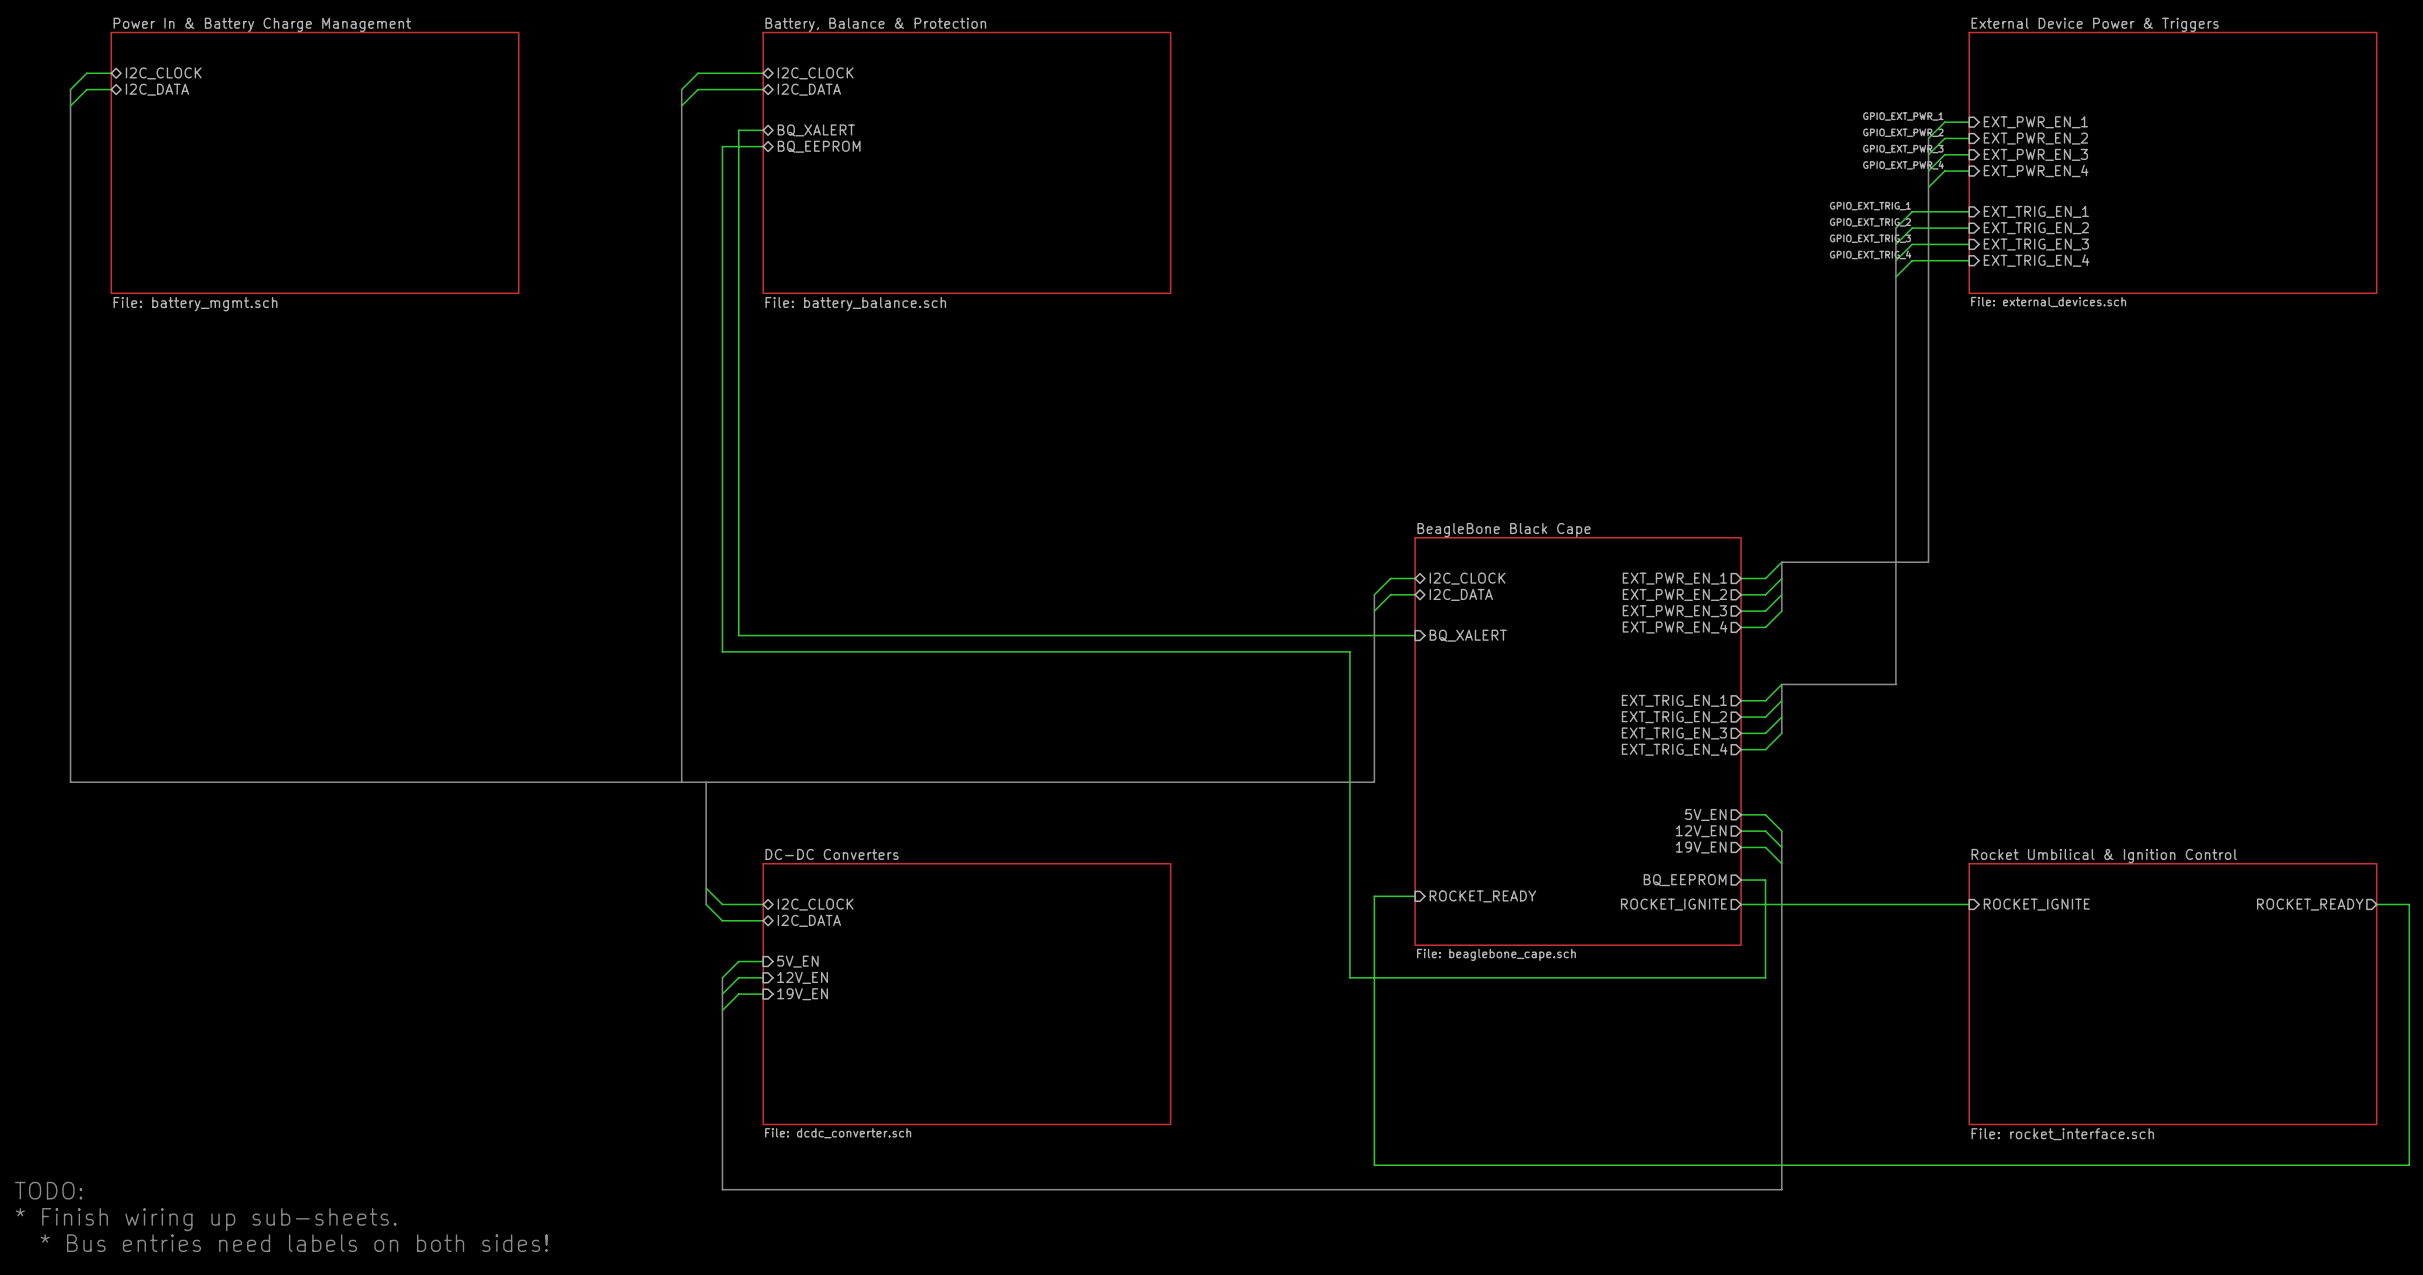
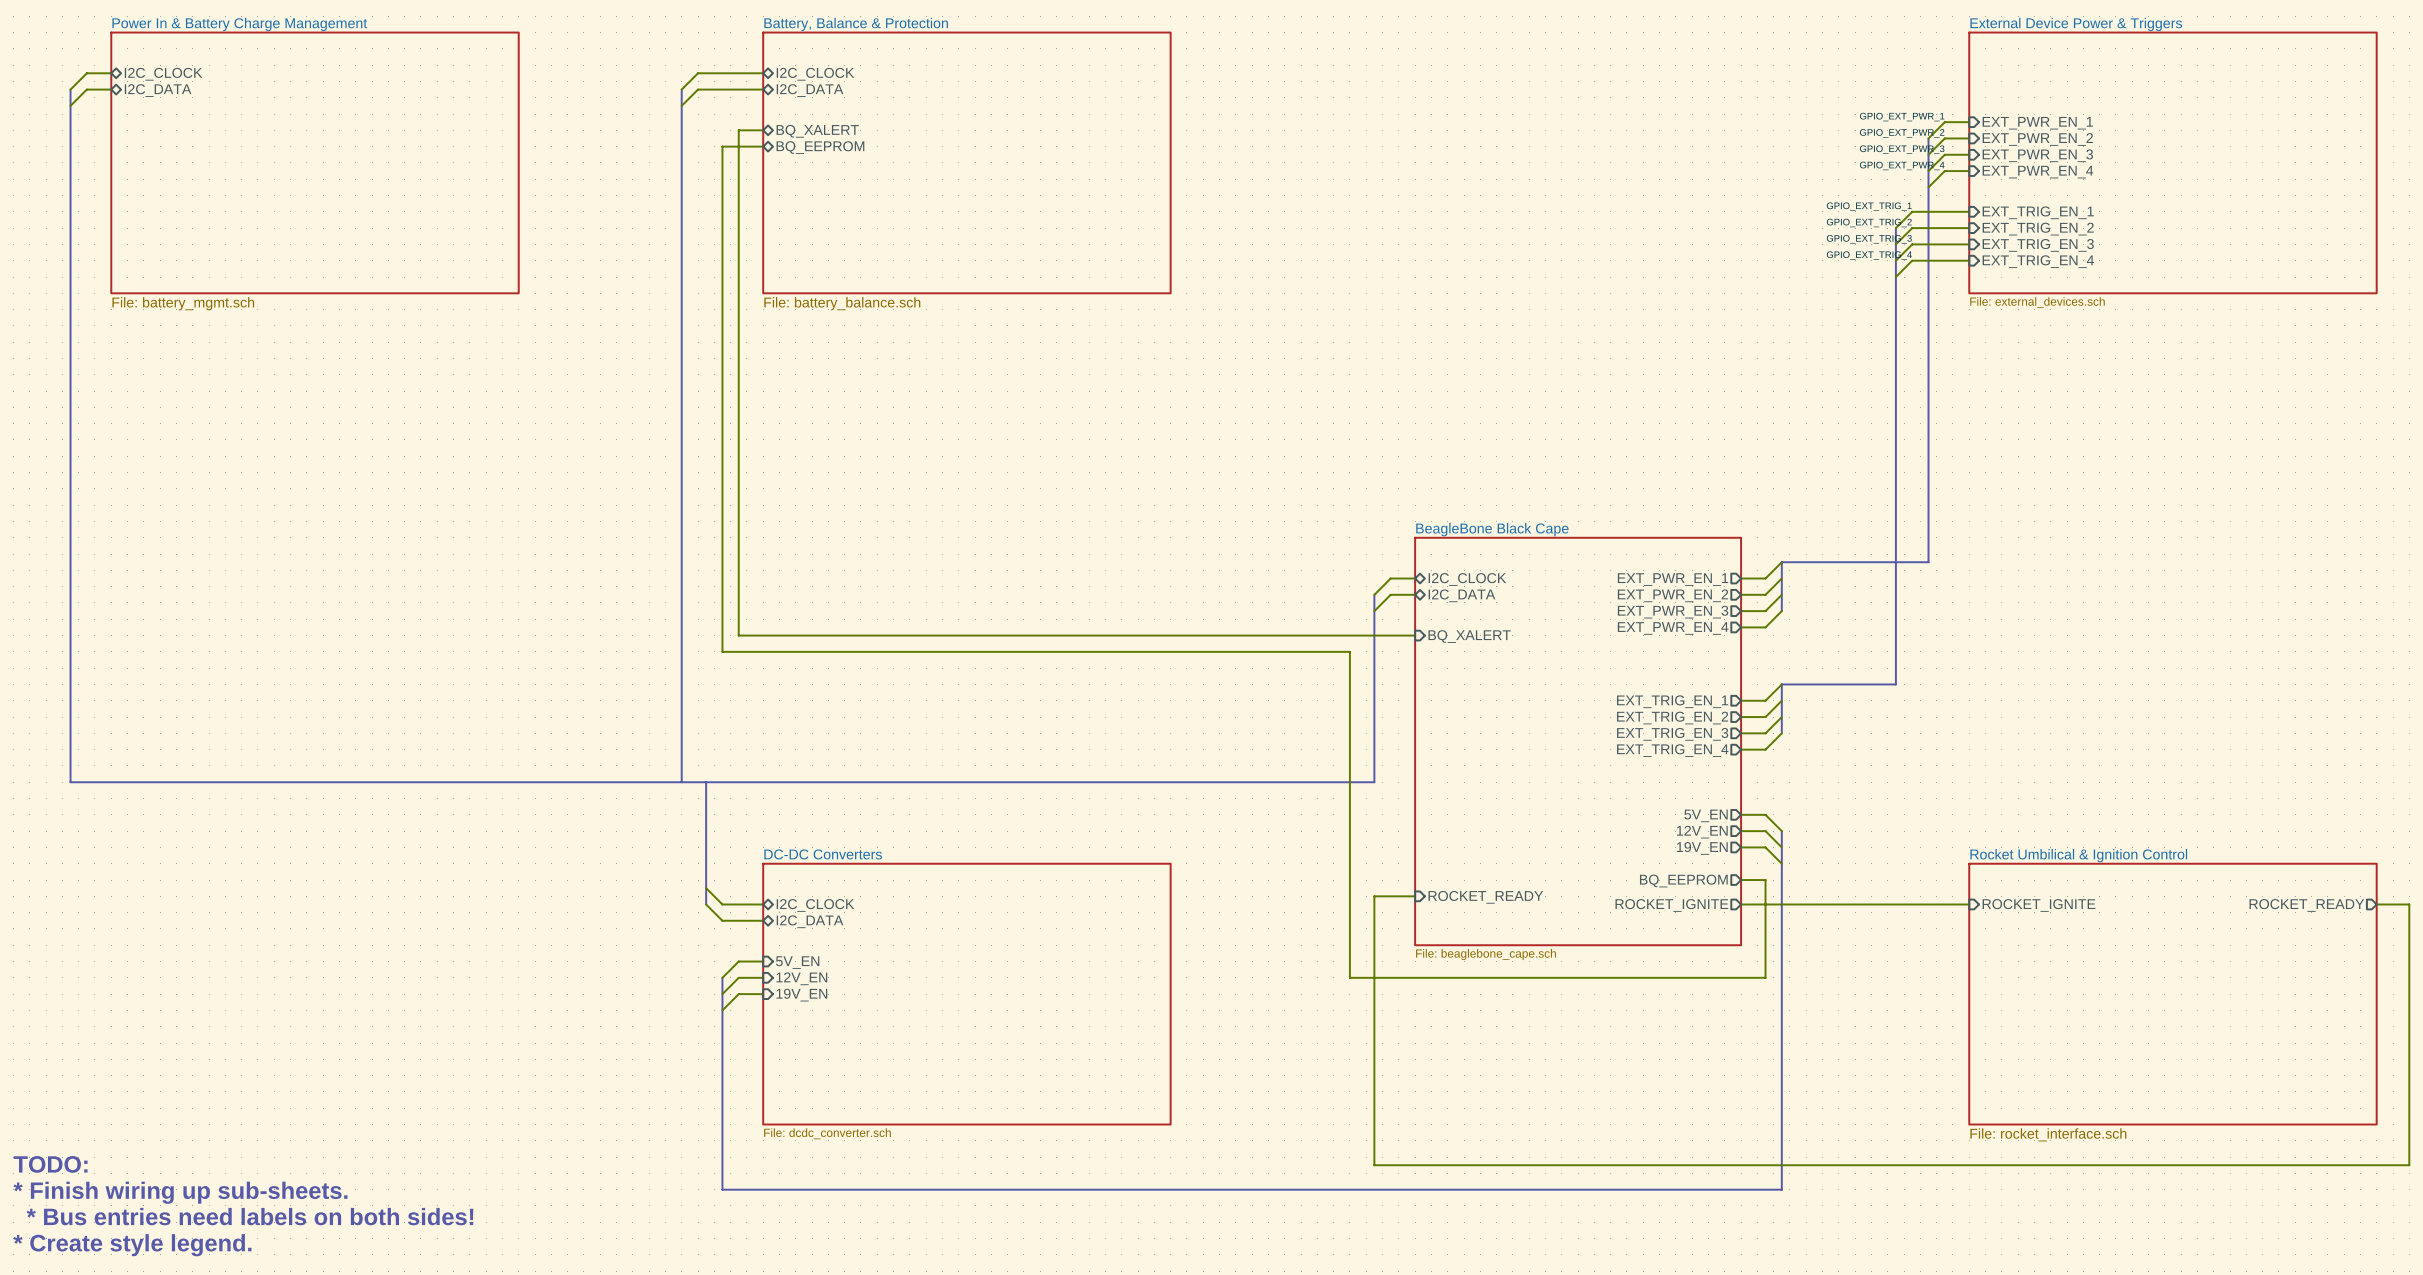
text: none -> TODO: (50, 1164)
text: TODO: (48, 1190) -> * Finish wiring up sub-sheets. (180, 1192)
text: * Finish wiring up sub-sheets. (206, 1219) -> * Bus entries need labels on both sides! (250, 1216)
text: * Bus entries need labels on both sides! (294, 1243) -> * Create style legend. (132, 1245)

